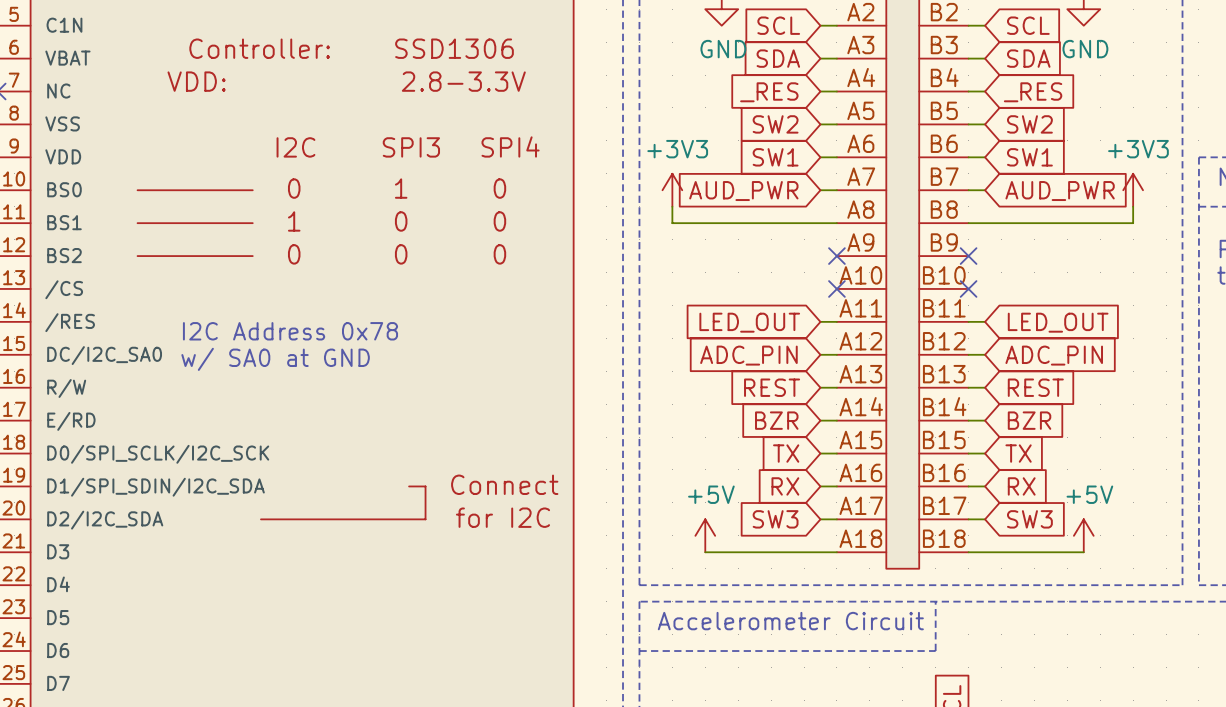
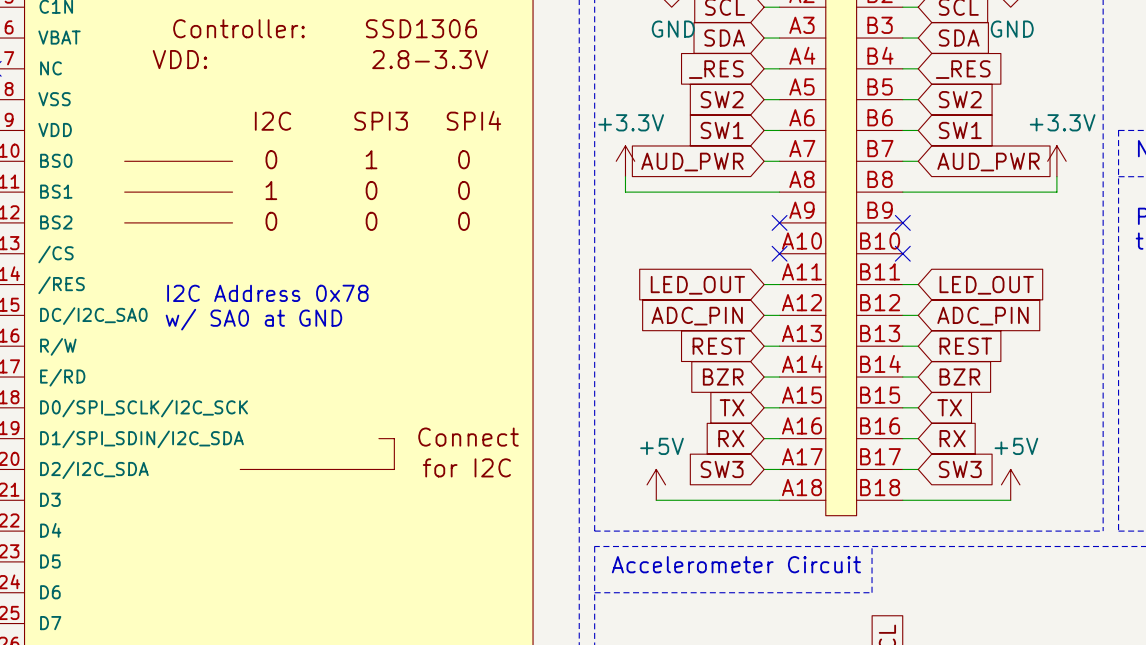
power symbol: +3V3 (672, 190) -> +3.3V (625, 161)
power symbol: +3V3 (1133, 190) -> +3.3V (1056, 161)

